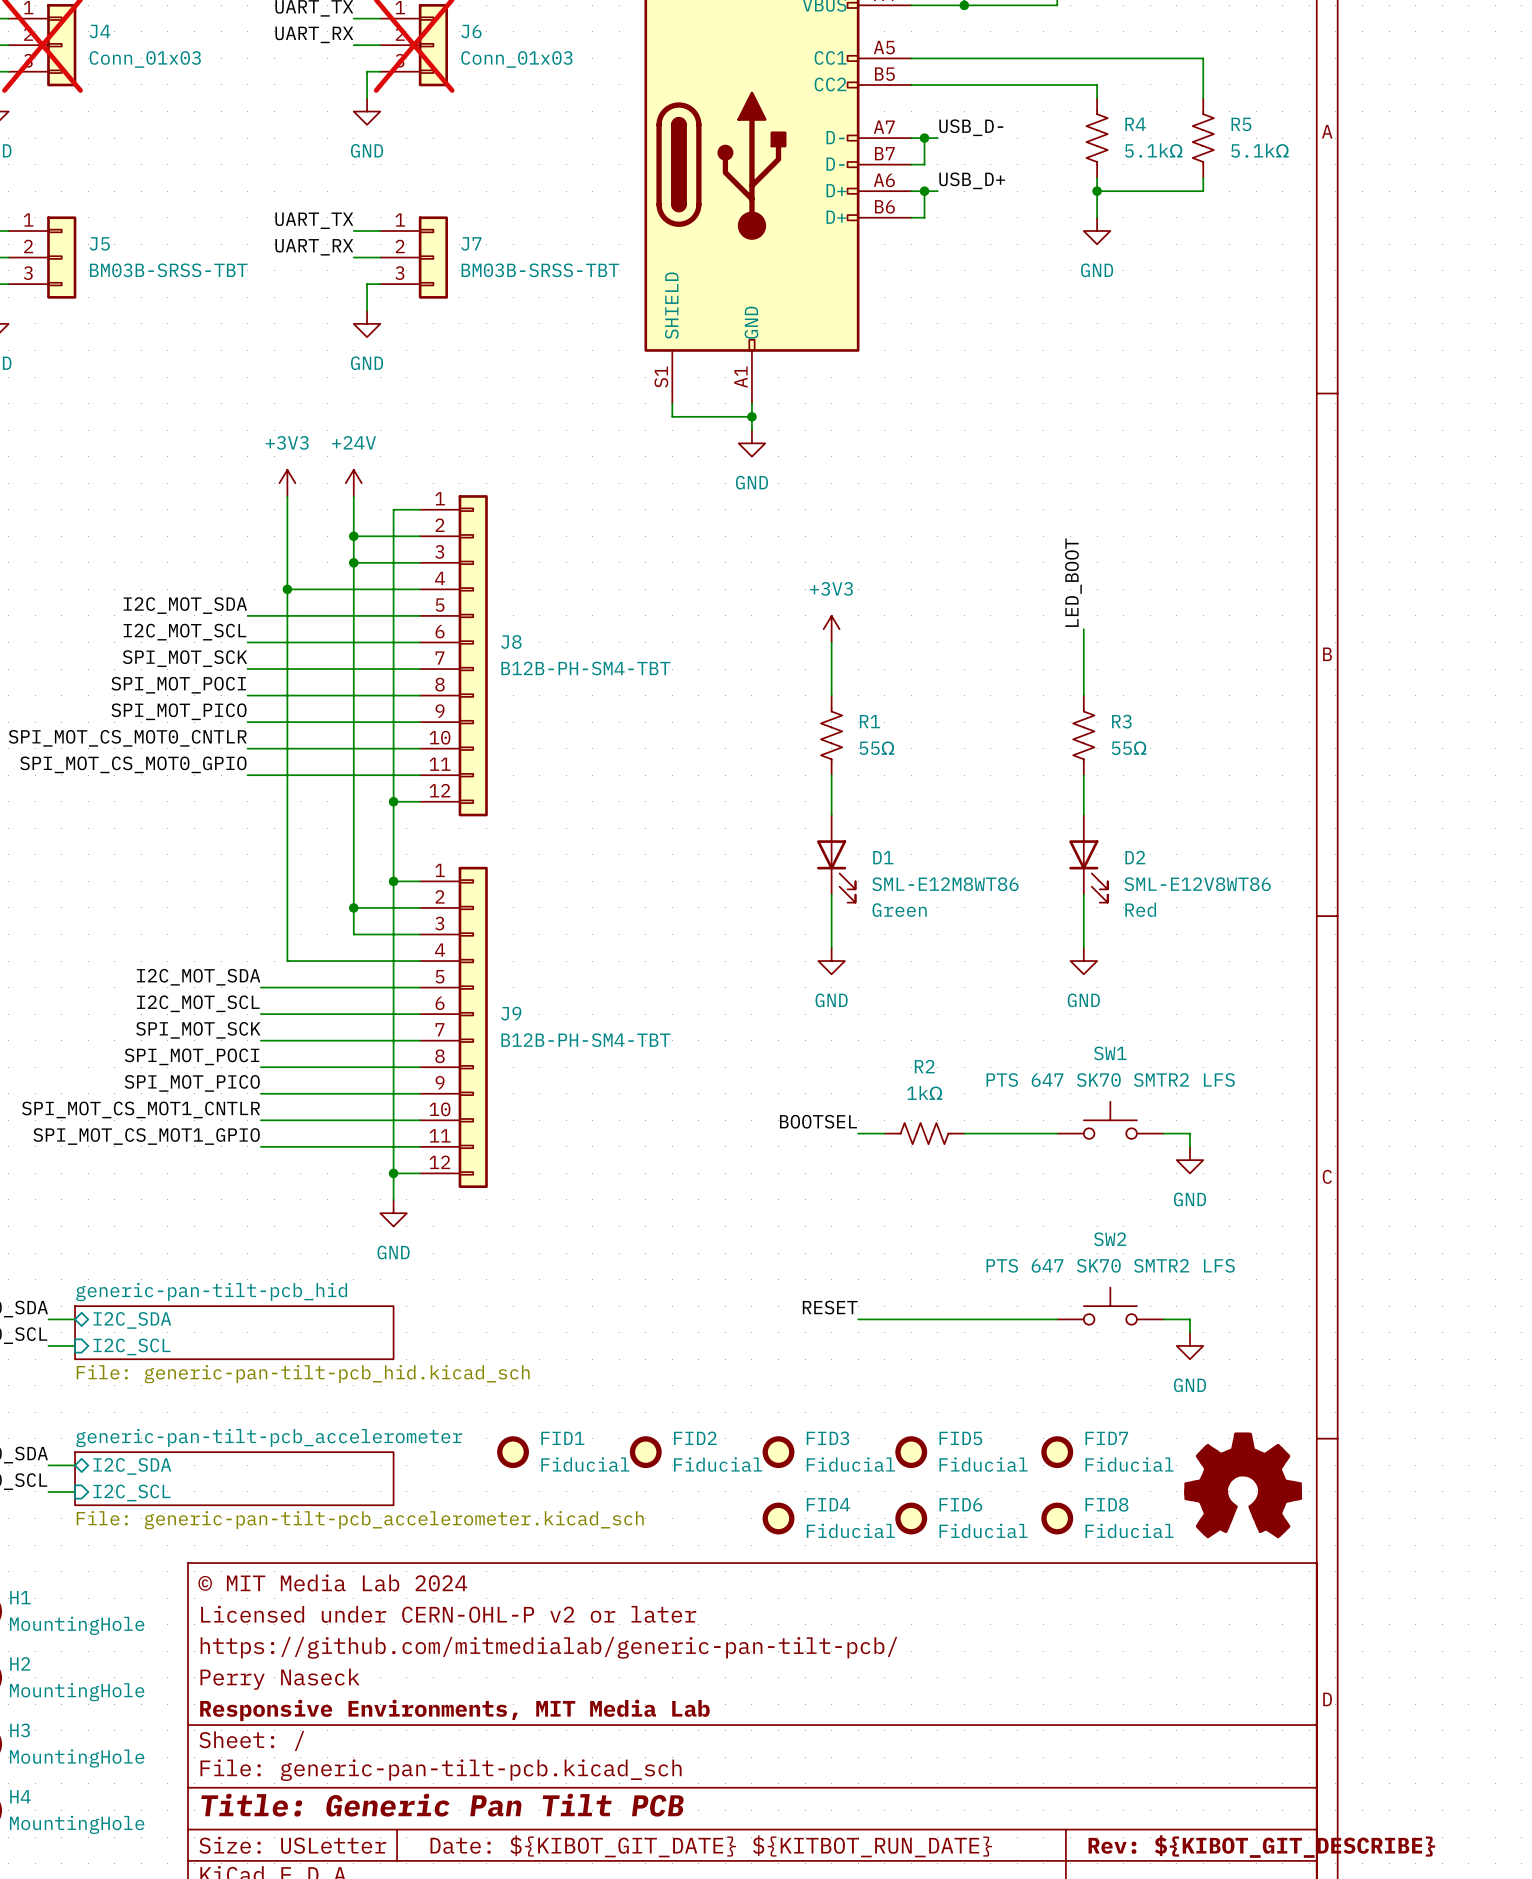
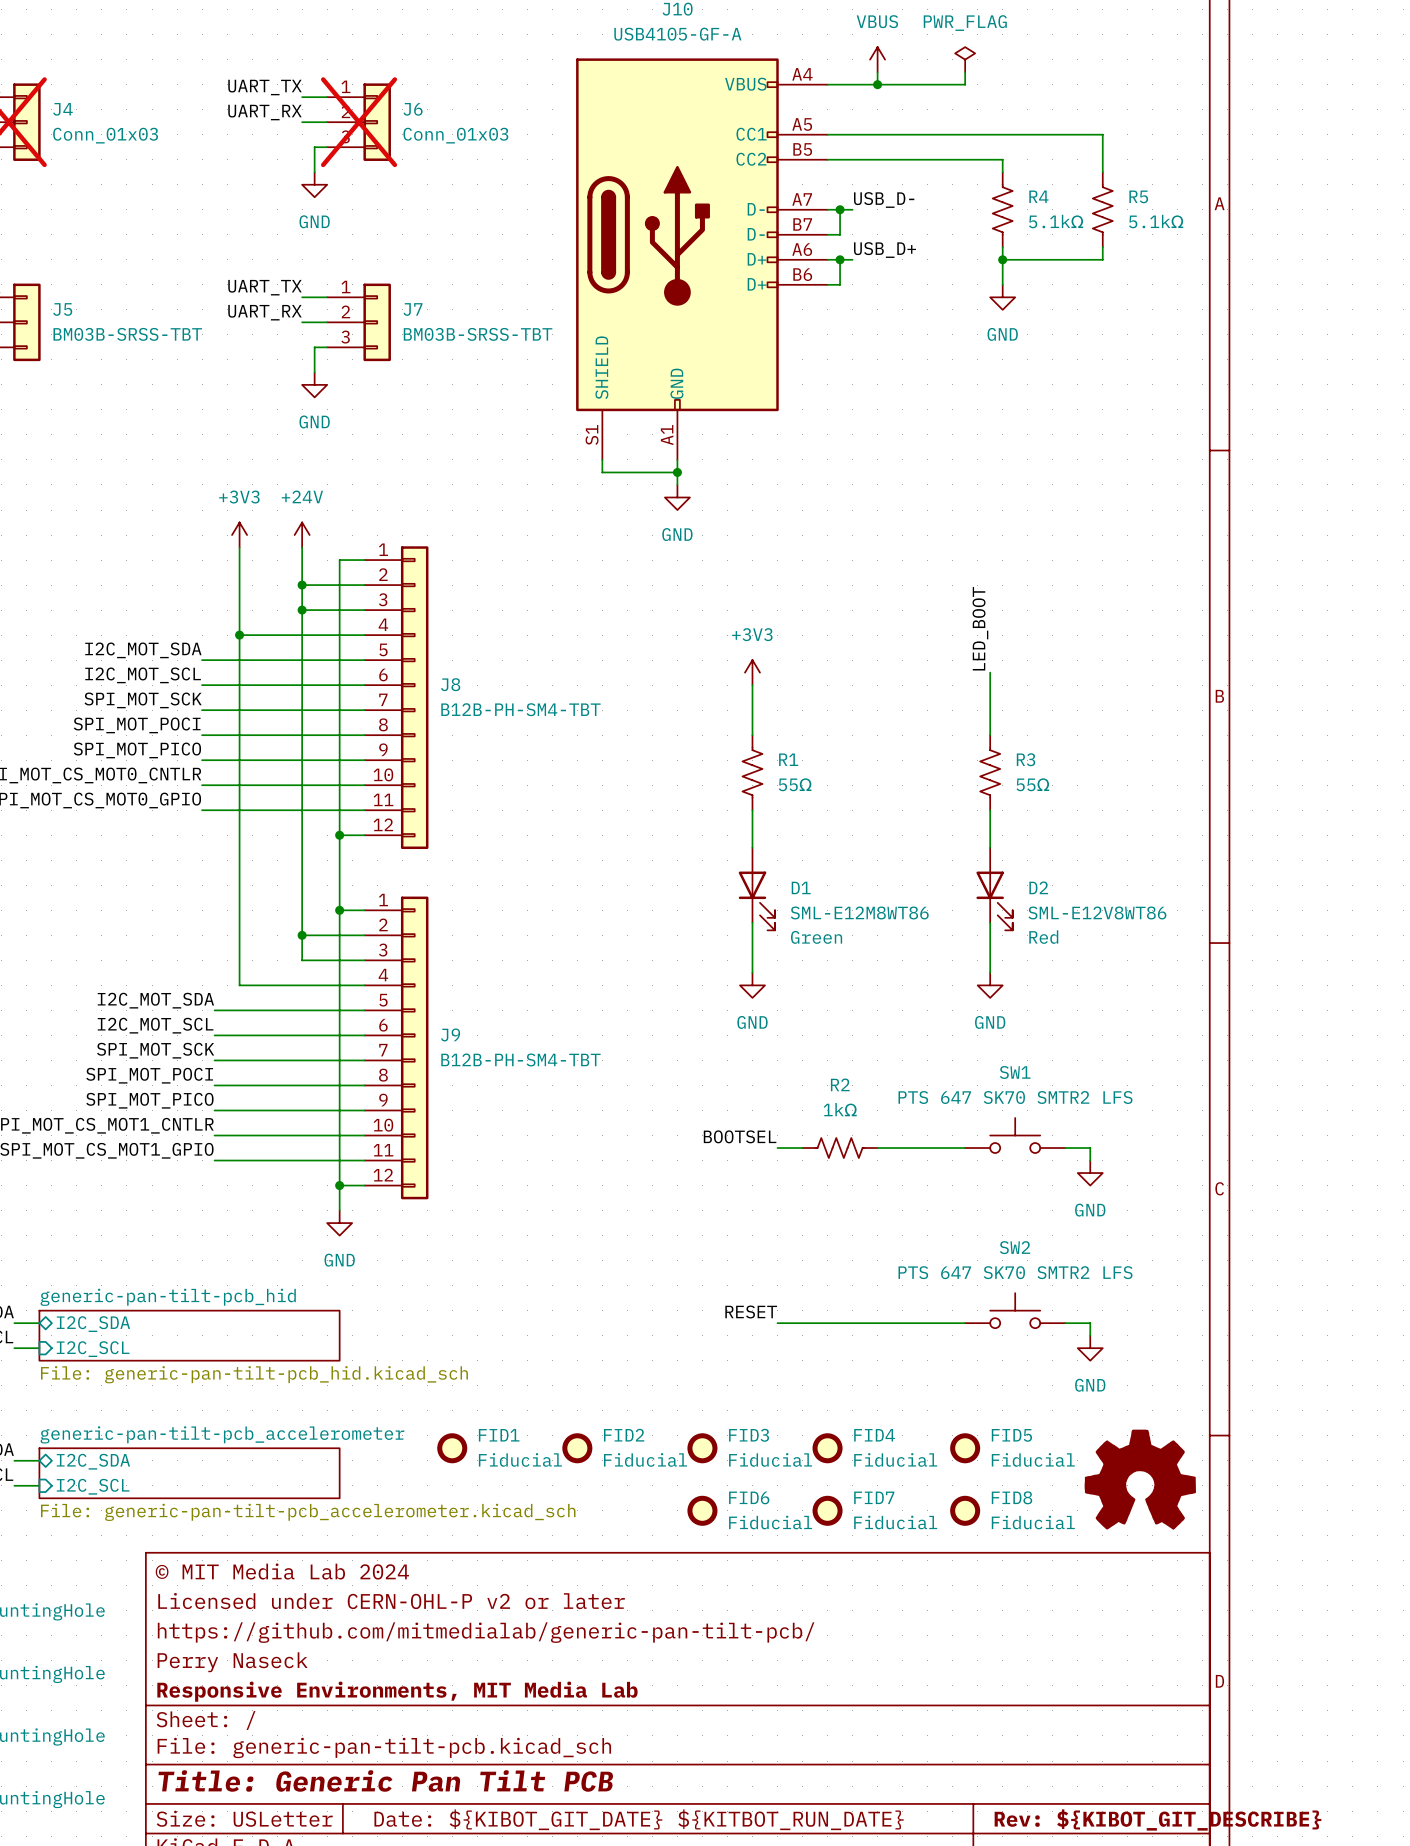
FID5 name: FID5 (960, 1438) -> FID4 (874, 1435)
FID7 name: FID7 (1106, 1438) -> FID5 (1011, 1435)
FID4 name: FID4 (828, 1504) -> FID6 (749, 1497)
FID6 name: FID6 (960, 1504) -> FID7 (874, 1497)

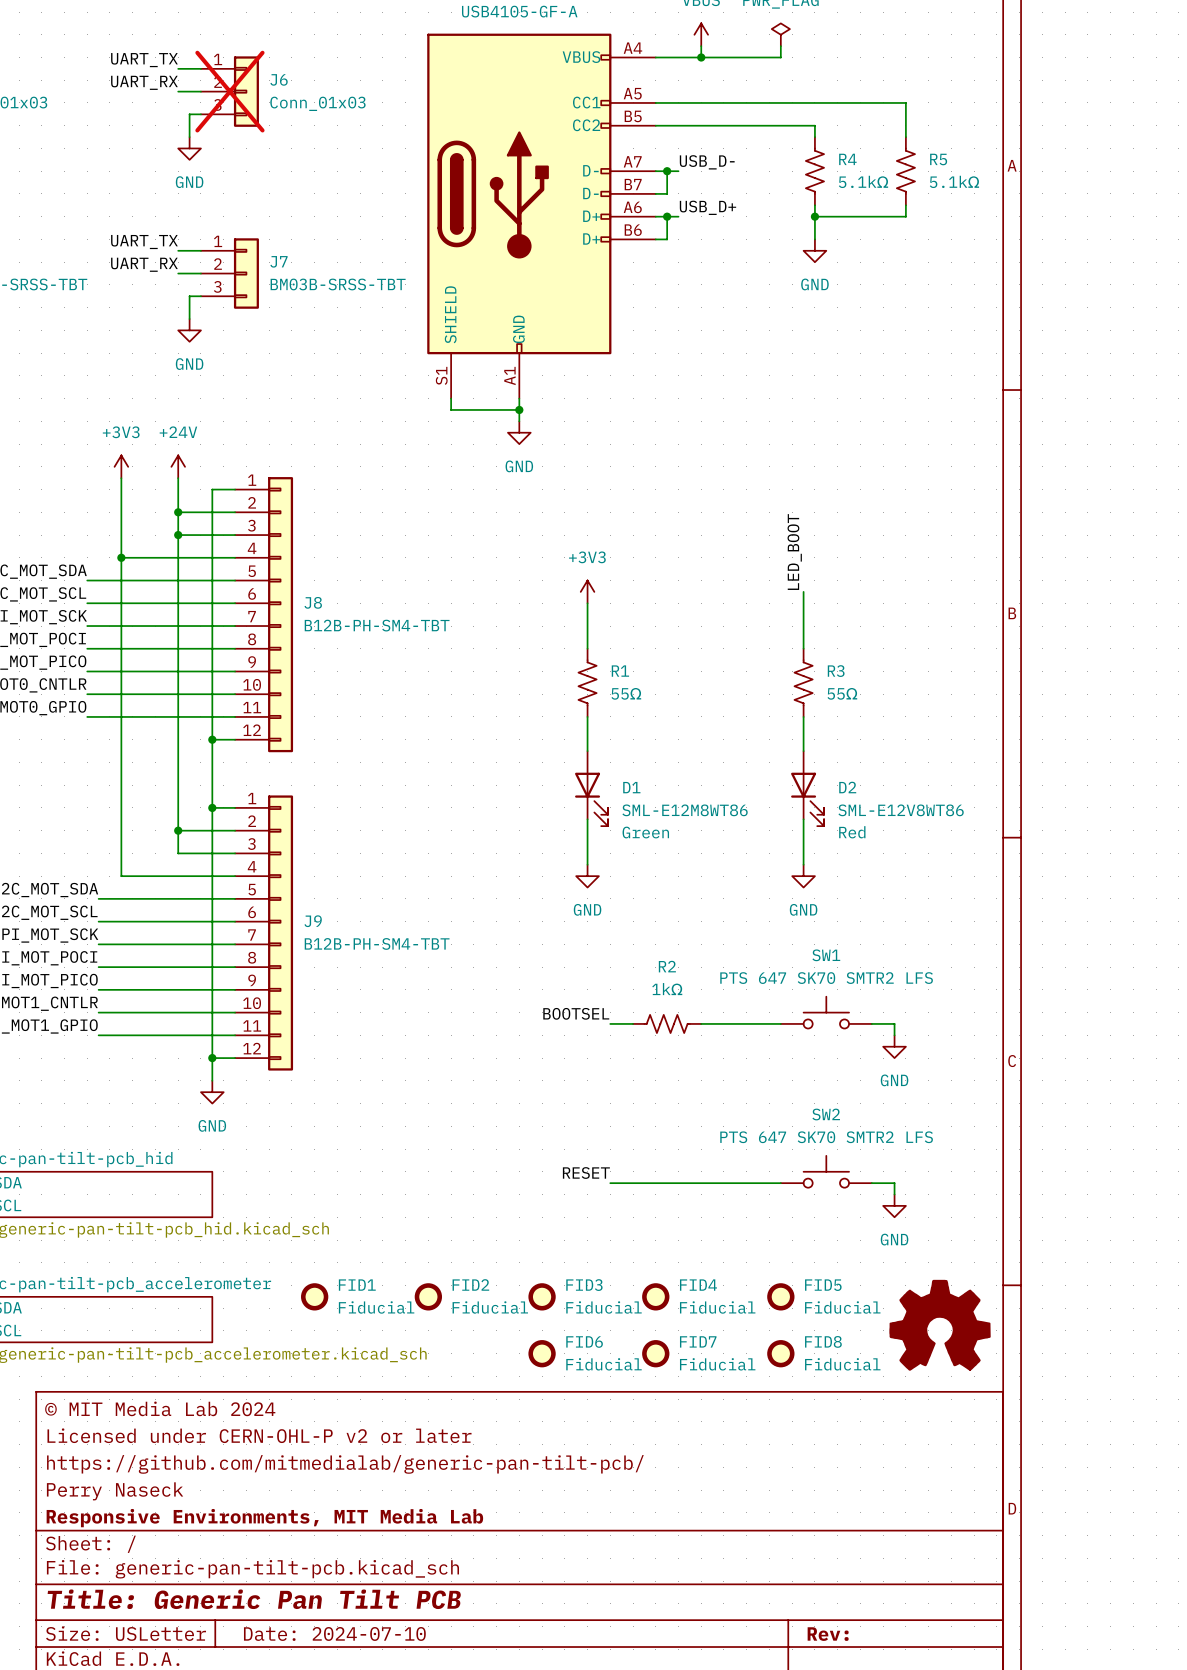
title block: Date: ${KIBOT_GIT_DATE} ${KITBOT_RUN_DATE} (639, 1819) -> Date: 2024-07-10 (334, 1633)
title block: Rev: ${KIBOT_GIT_DESCRIBE} (1157, 1820) -> Rev: (828, 1634)

